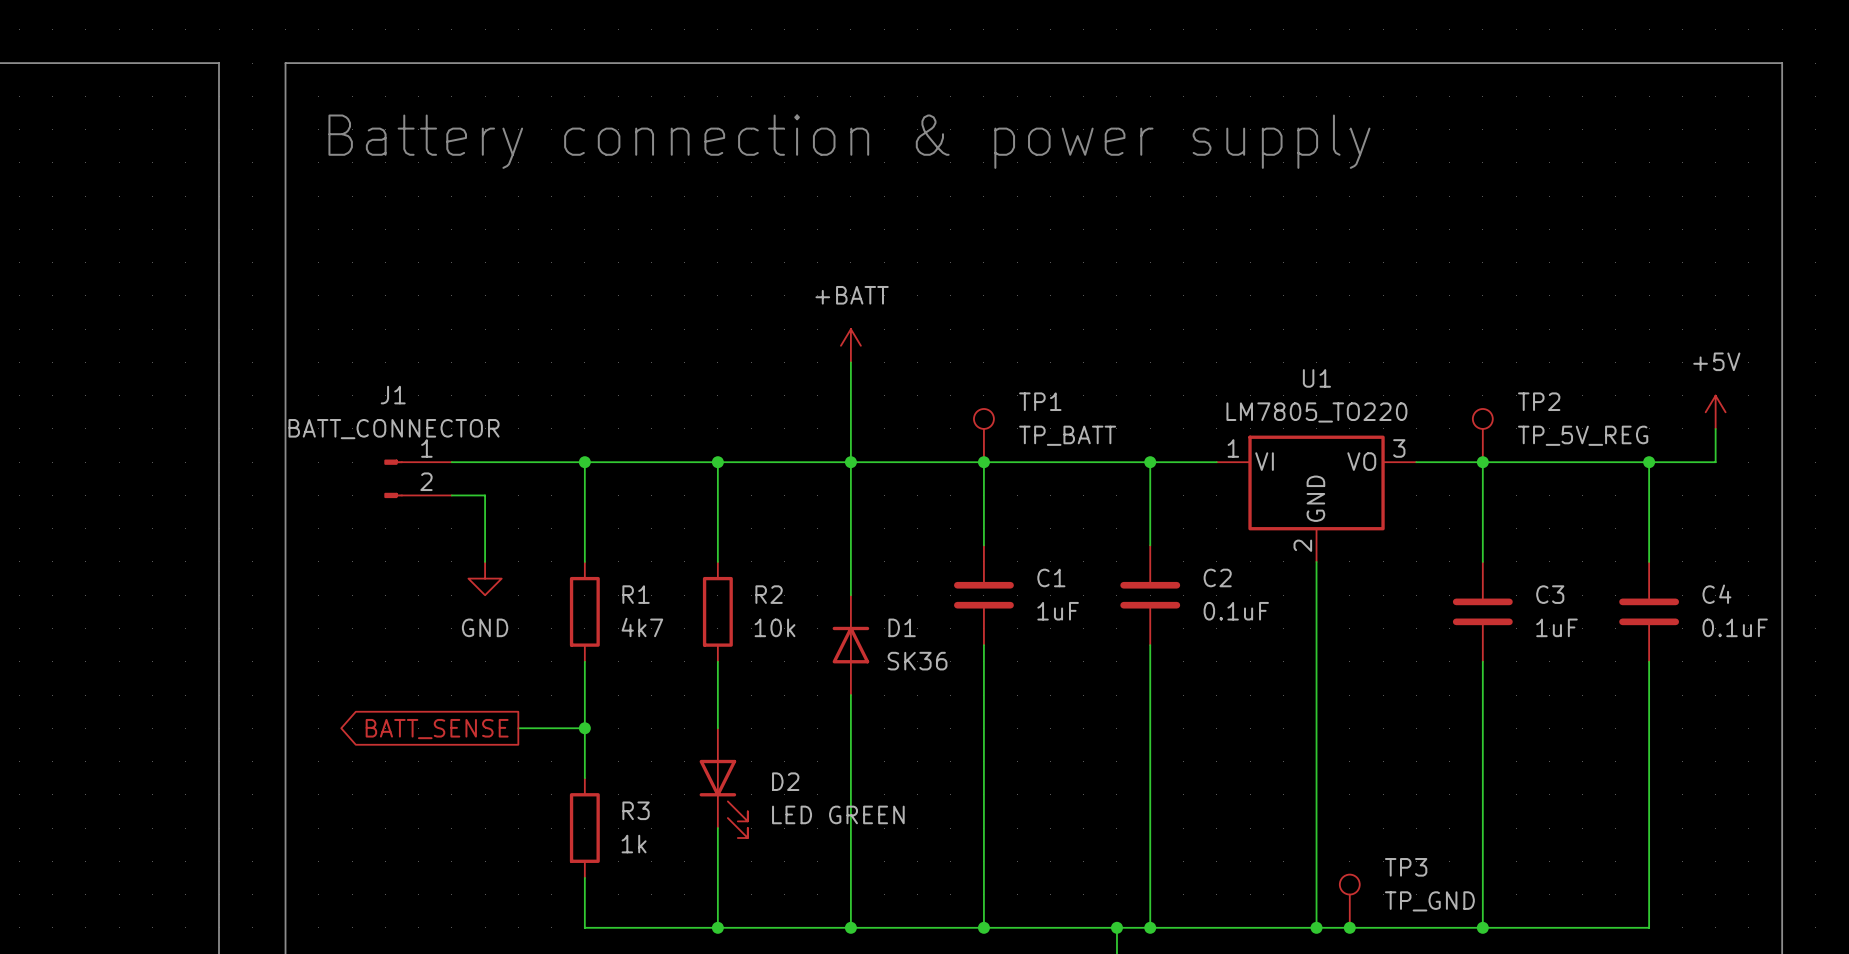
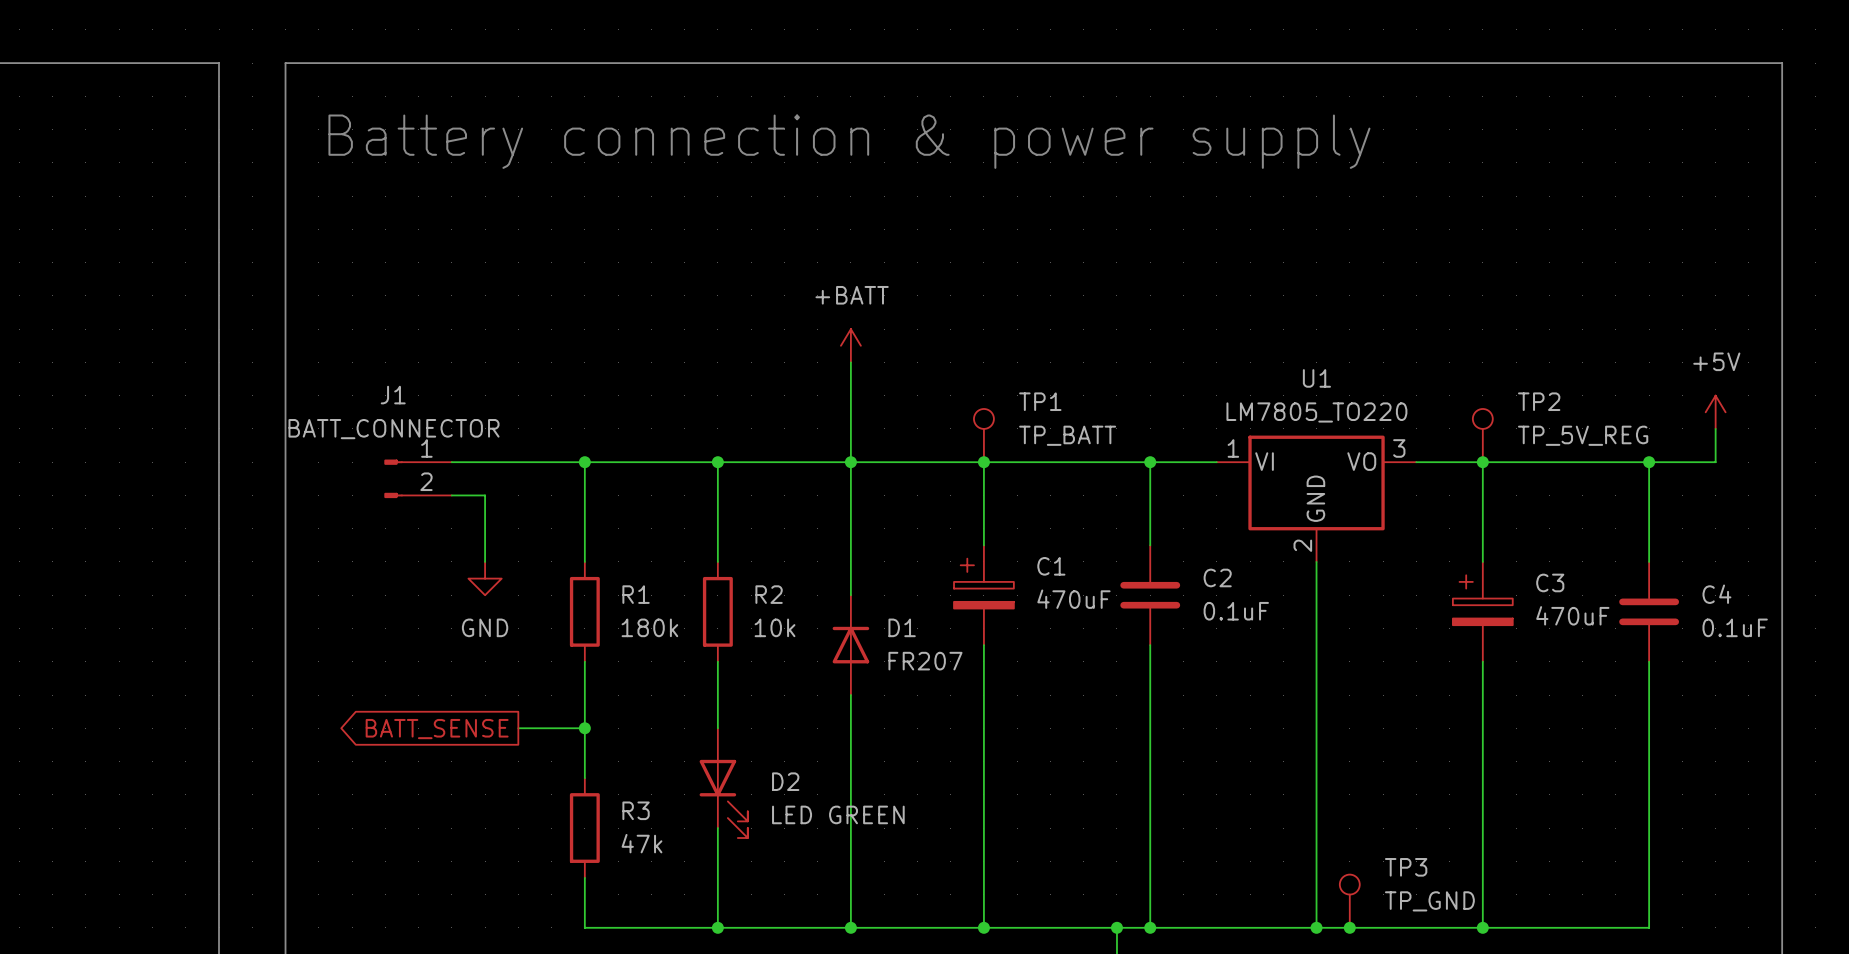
C1 symbol: [954, 545, 1014, 646] -> [954, 545, 1014, 646]
C3 symbol: [1452, 561, 1513, 662] -> [1452, 561, 1513, 662]
C1 value: 1uF (1058, 611) -> 470uF (1073, 599)
R1 value: 4k7 (642, 627) -> 180k (649, 627)
C3 value: 1uF (1556, 627) -> 470uF (1572, 615)
D1 value: SK36 (917, 661) -> FR207 (925, 661)
R3 value: 1k (634, 844) -> 47k (641, 843)

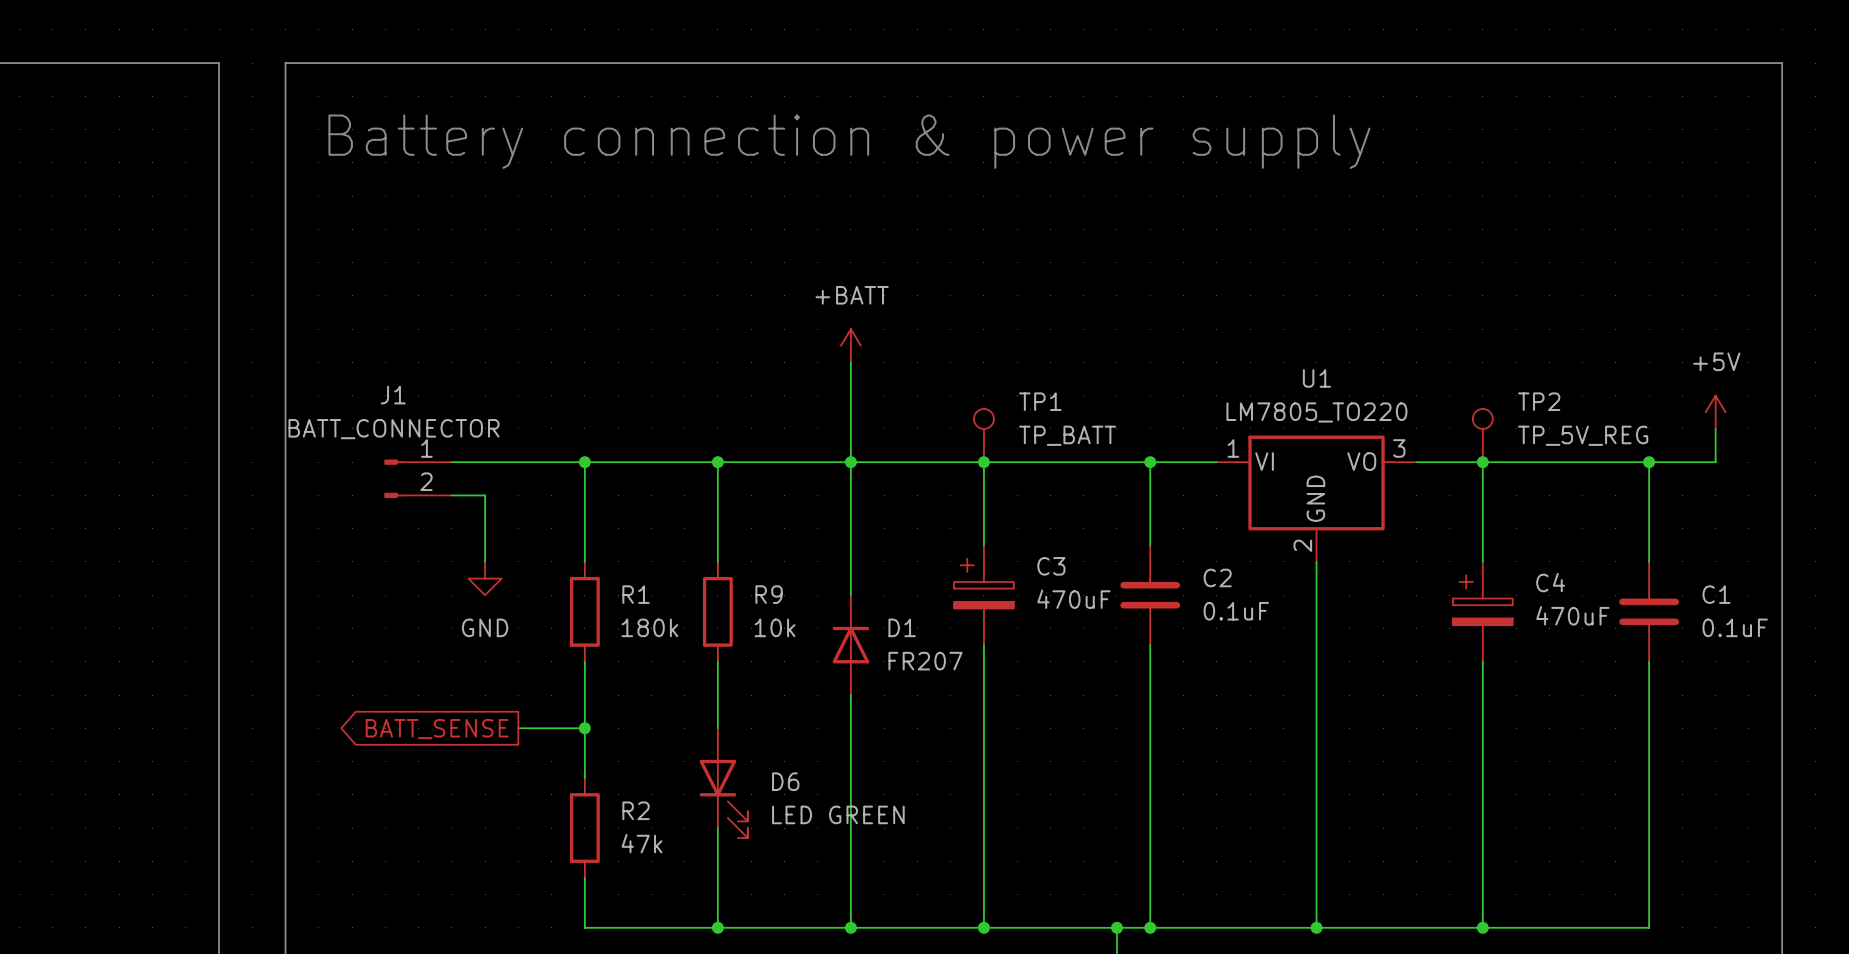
C1 name: C1 (1051, 566) -> C3 (1051, 566)
C3 name: C3 (1550, 582) -> C4 (1550, 582)
R2 name: R2 (769, 594) -> R9 (769, 594)
C4 name: C4 (1716, 594) -> C1 (1716, 594)
D2 name: D2 (785, 781) -> D6 (785, 781)
R3 name: R3 (636, 810) -> R2 (636, 810)
TP3: TP_GND (1349, 901) -> none
junction: (1349, 927) -> none

